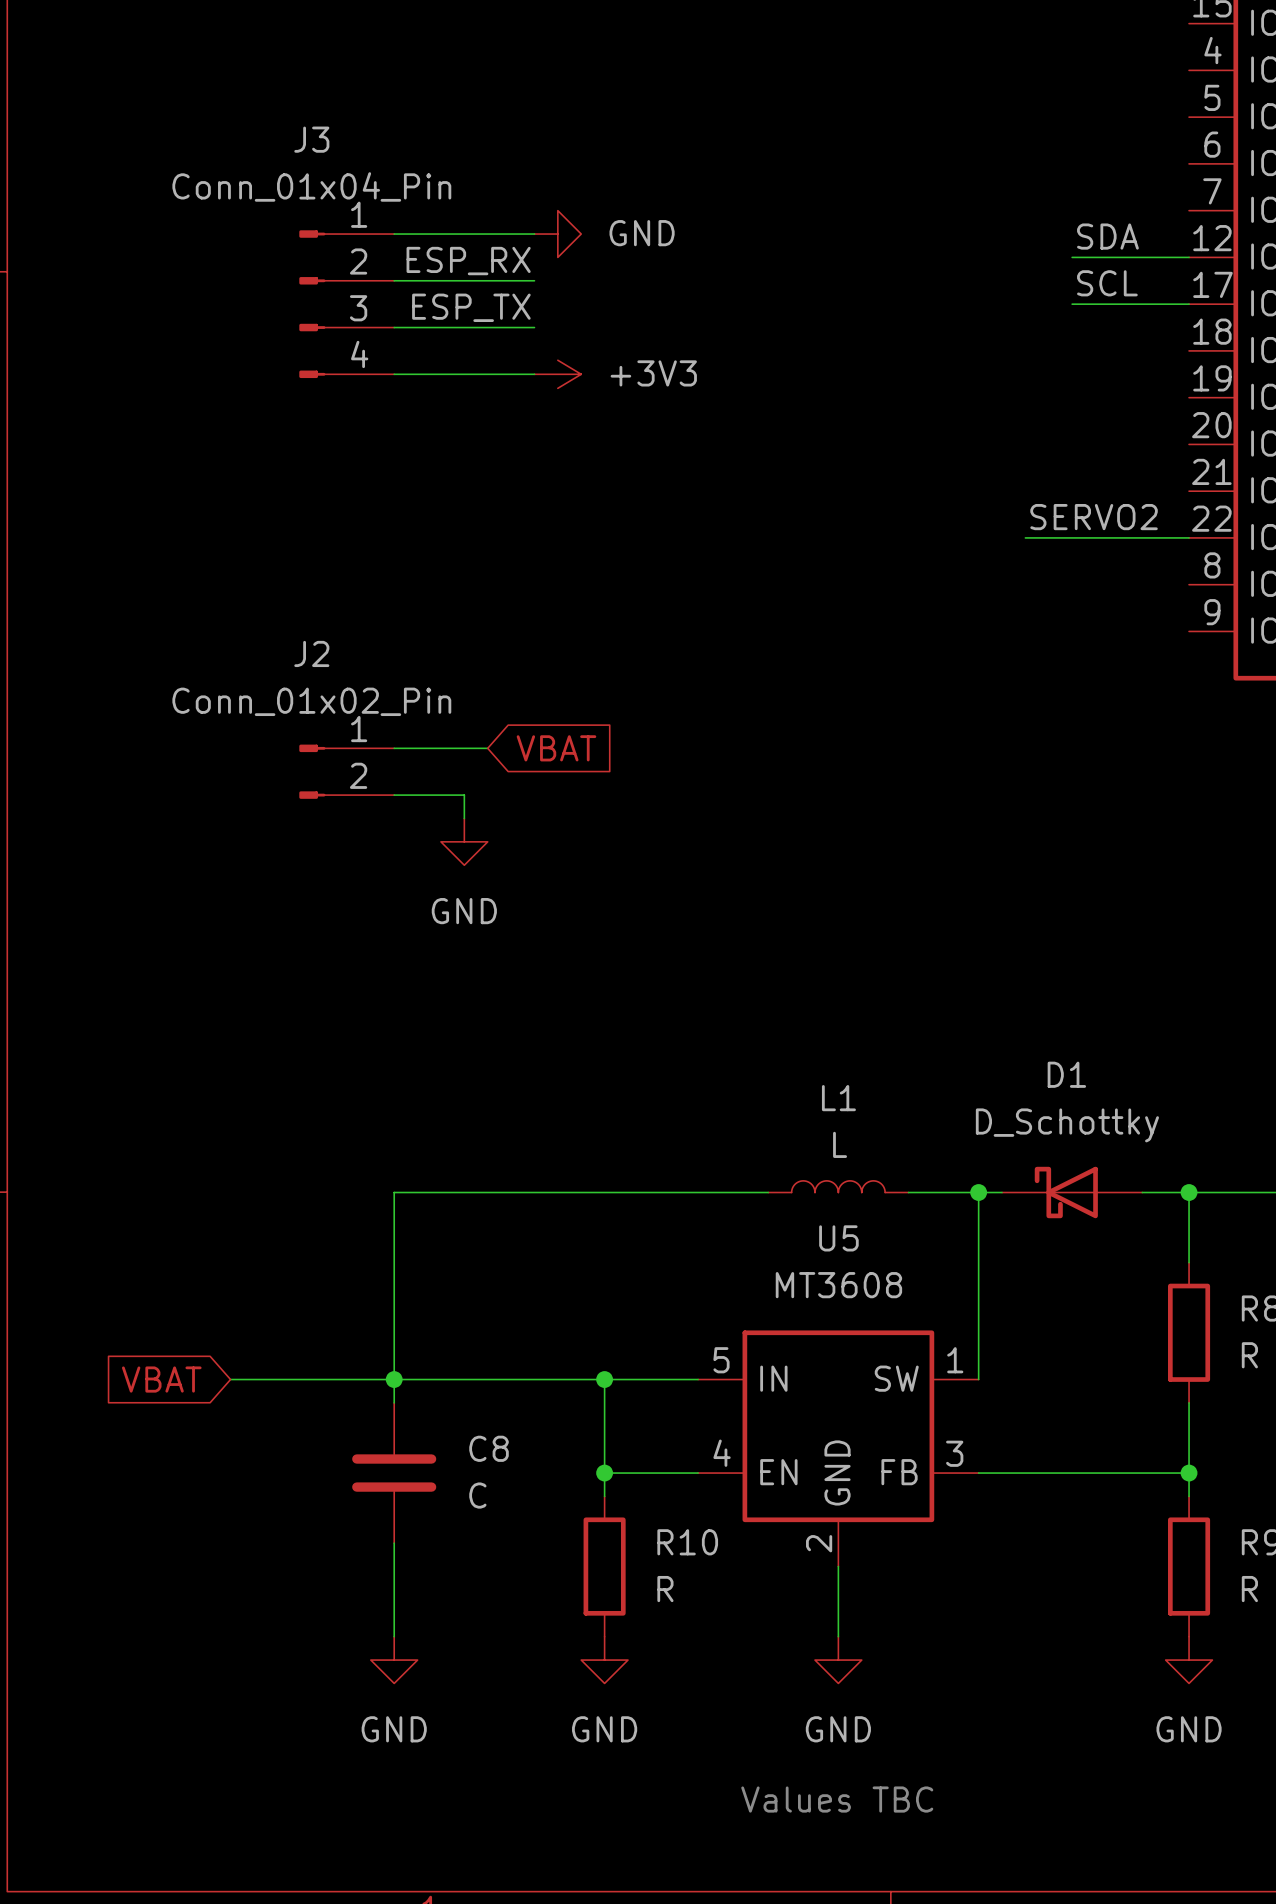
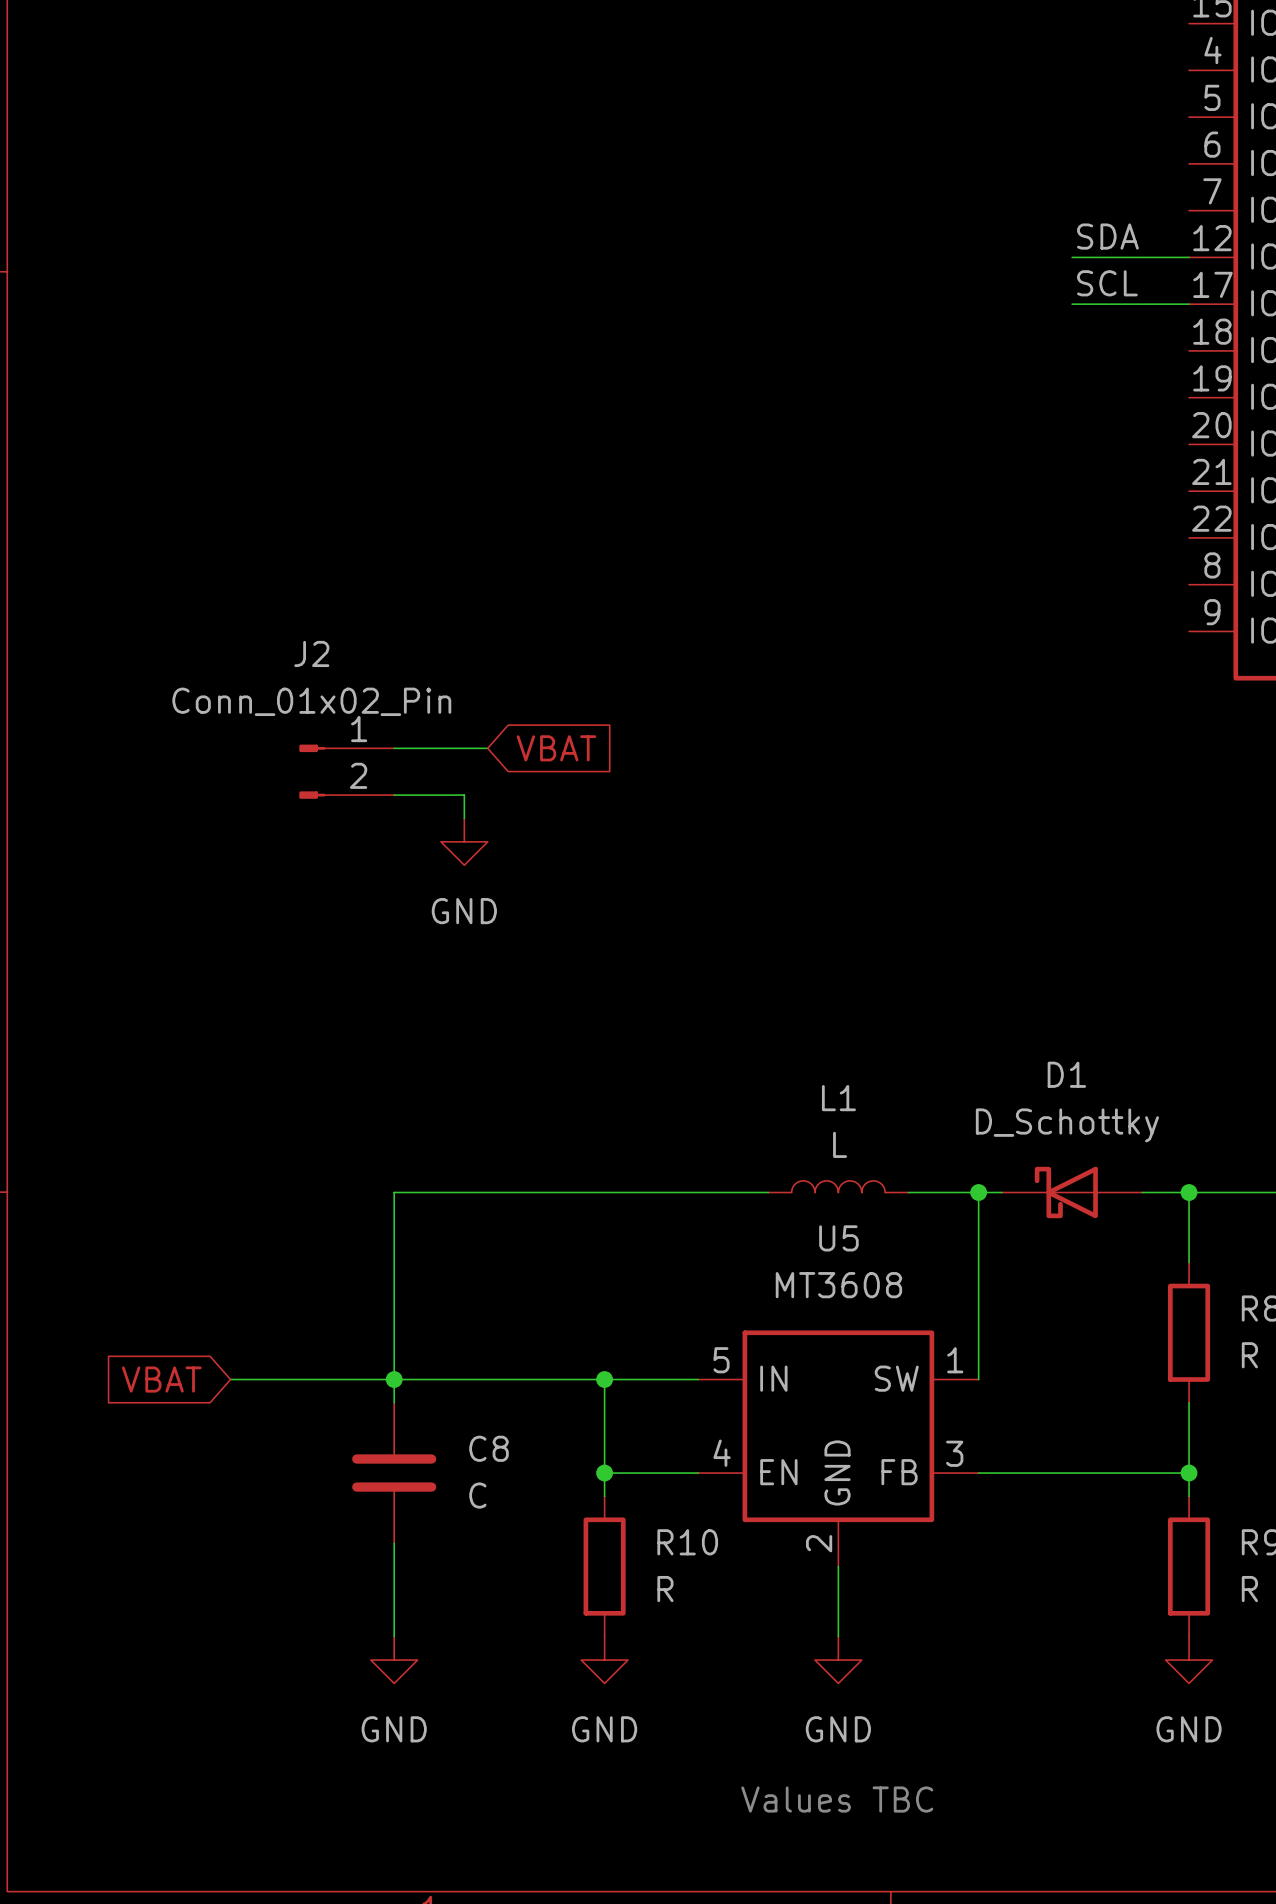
wire: (394, 234) (534, 234) -> none
power symbol: GND (557, 234) -> none
label: ESP_RX (468, 261) -> none
wire: (394, 280) (534, 280) -> none
J3: Conn_01x04_Pin (346, 304) -> none
label: ESP_TX (471, 307) -> none
wire: (394, 327) (534, 327) -> none
wire: (394, 374) (534, 374) -> none
power symbol: +3V3 (557, 374) -> none
label: SERVO2 (1094, 517) -> none
wire: (1025, 537) (1189, 537) -> none

